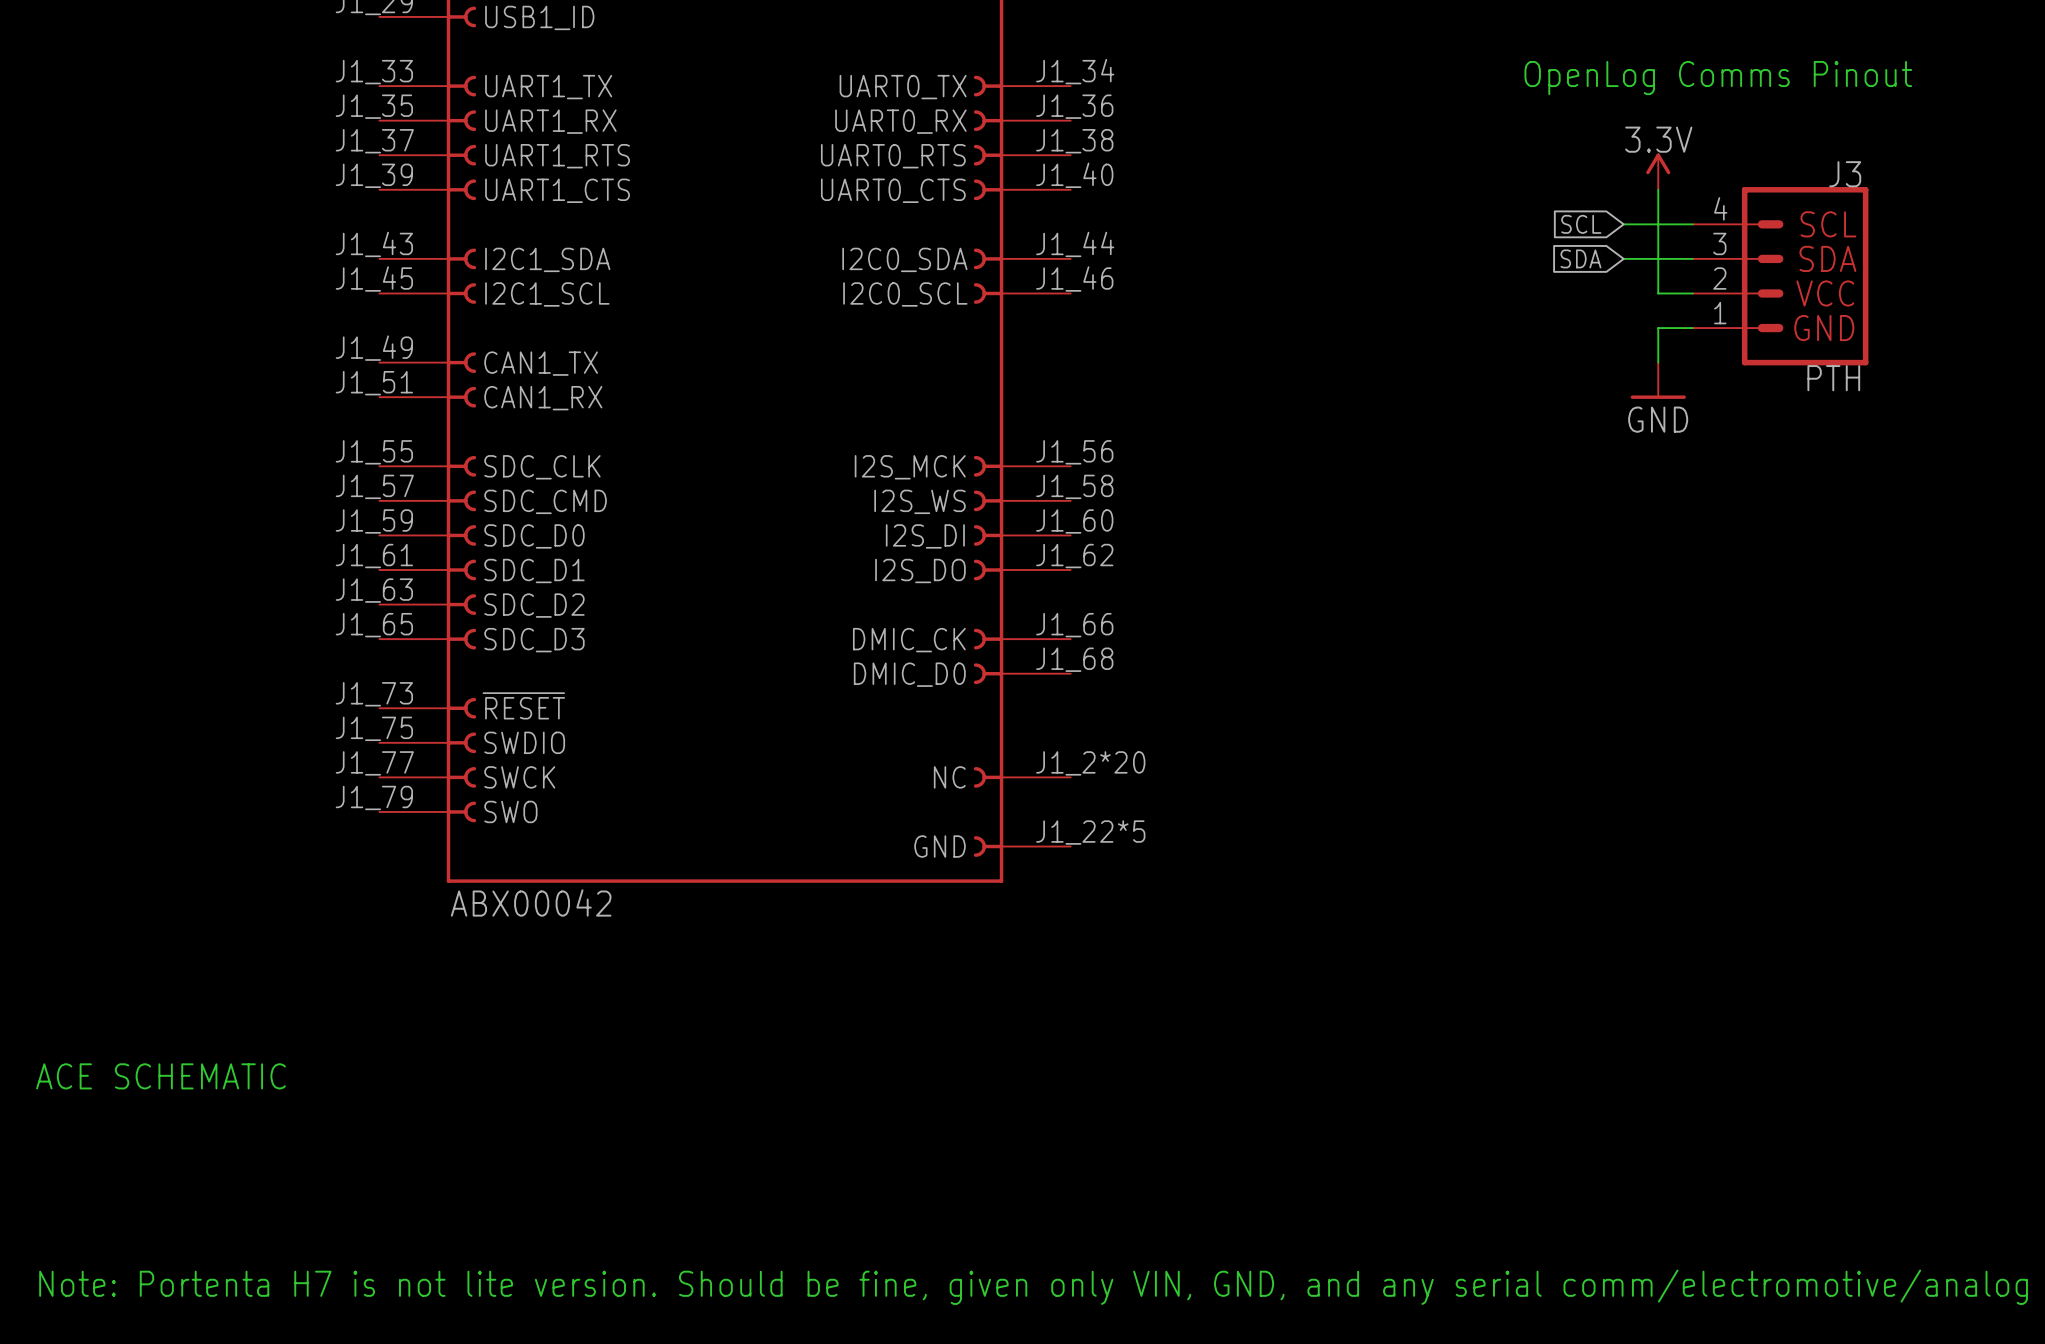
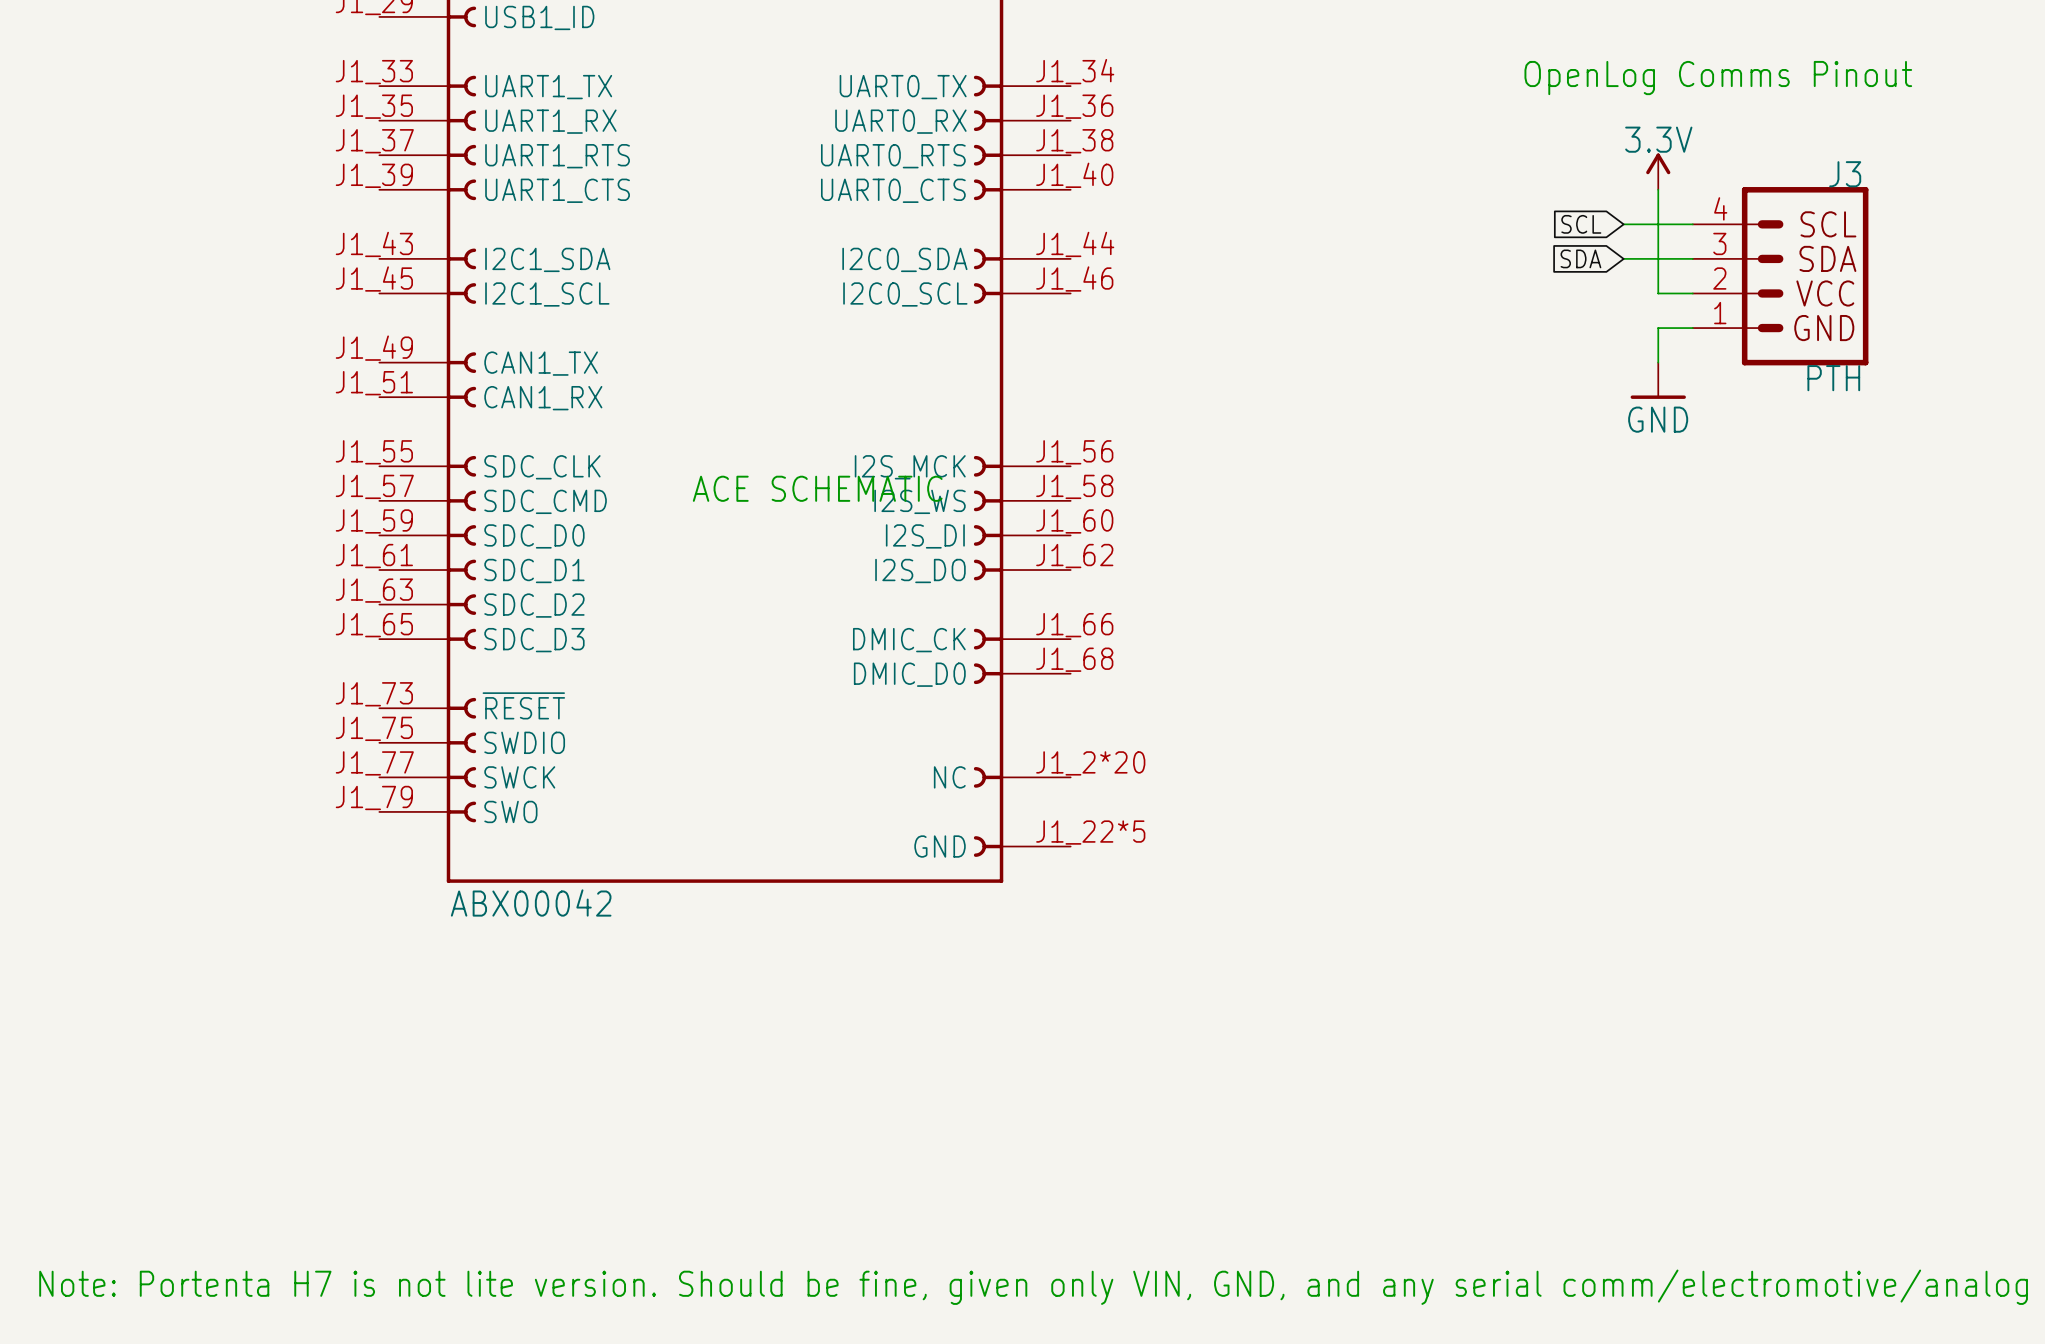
text: none -> ACE SCHEMATIC (817, 488)
text: ACE SCHEMATIC (160, 1076) -> none

